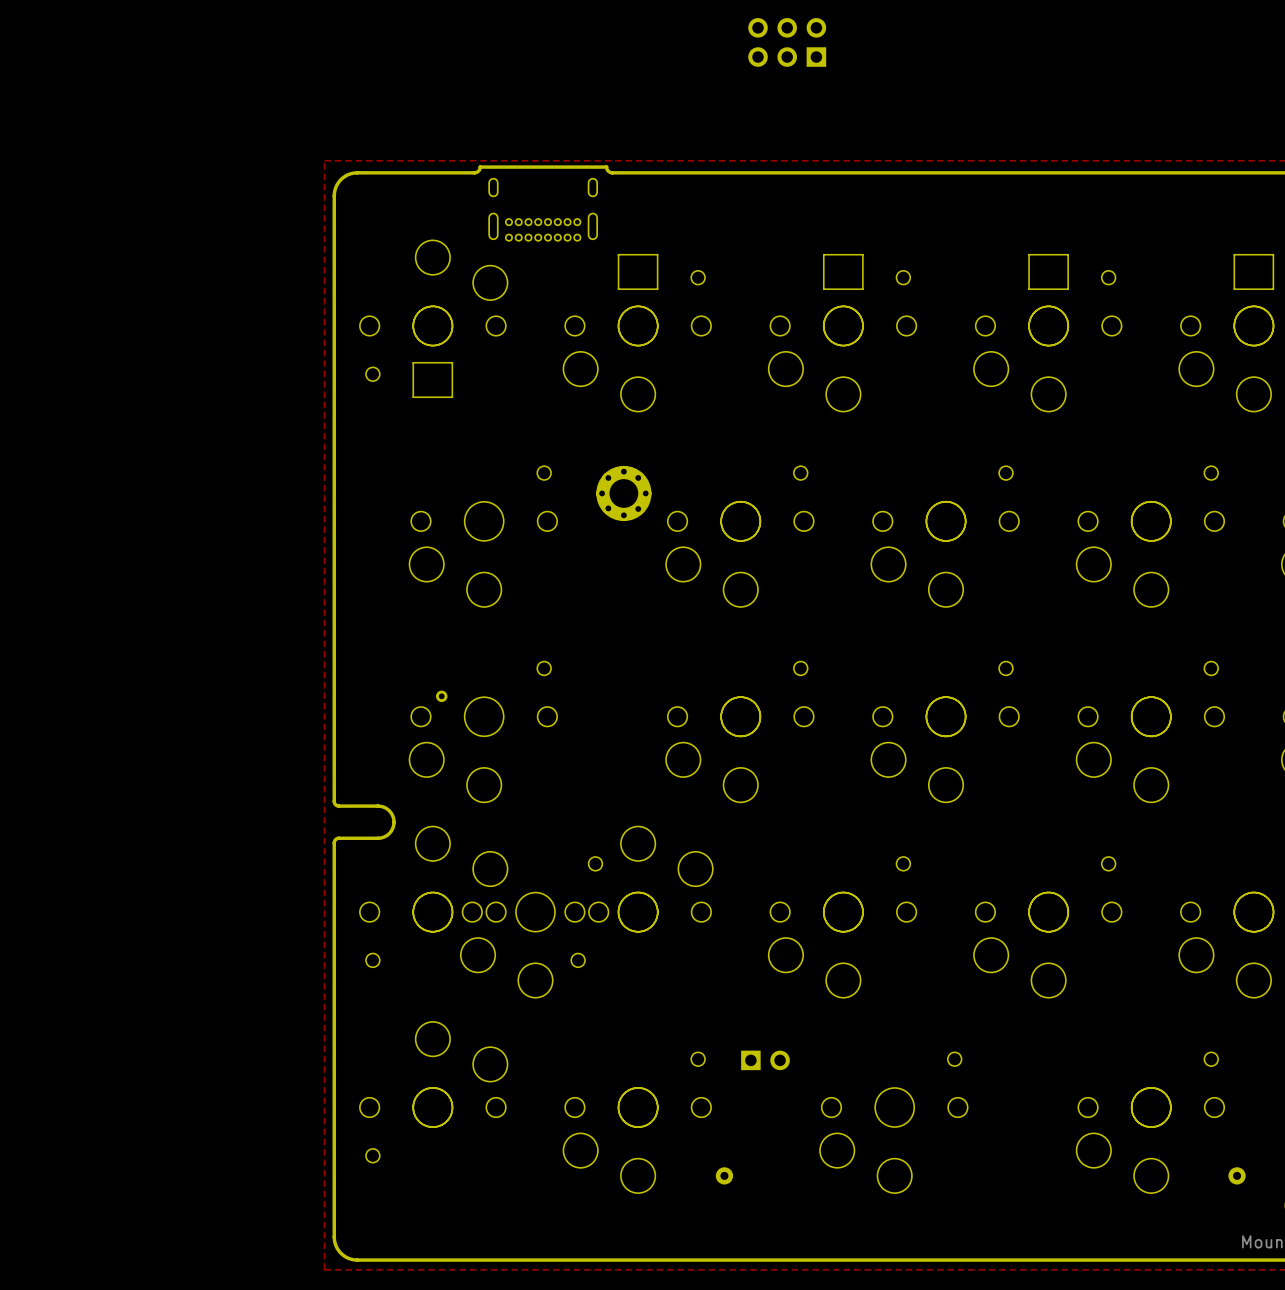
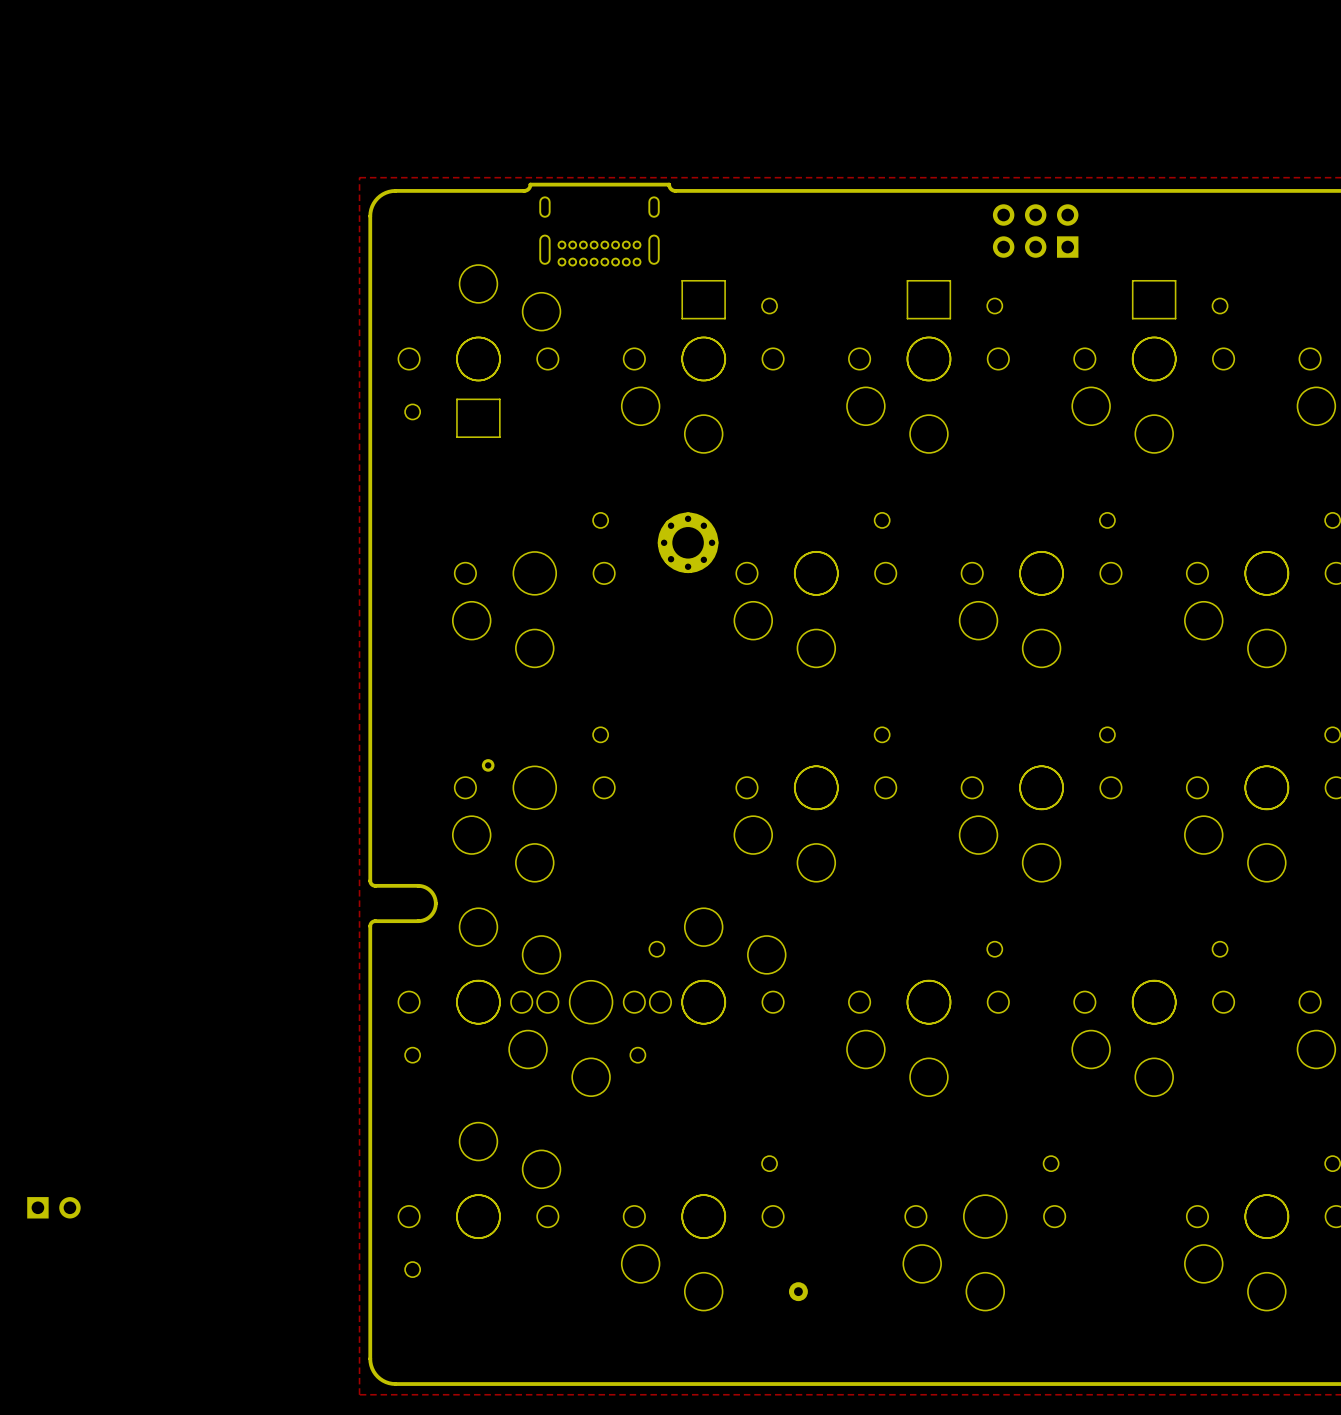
part position: (787, 42) -> (1035, 231)
part: (765, 1060) -> none
part: none -> (53, 1207)

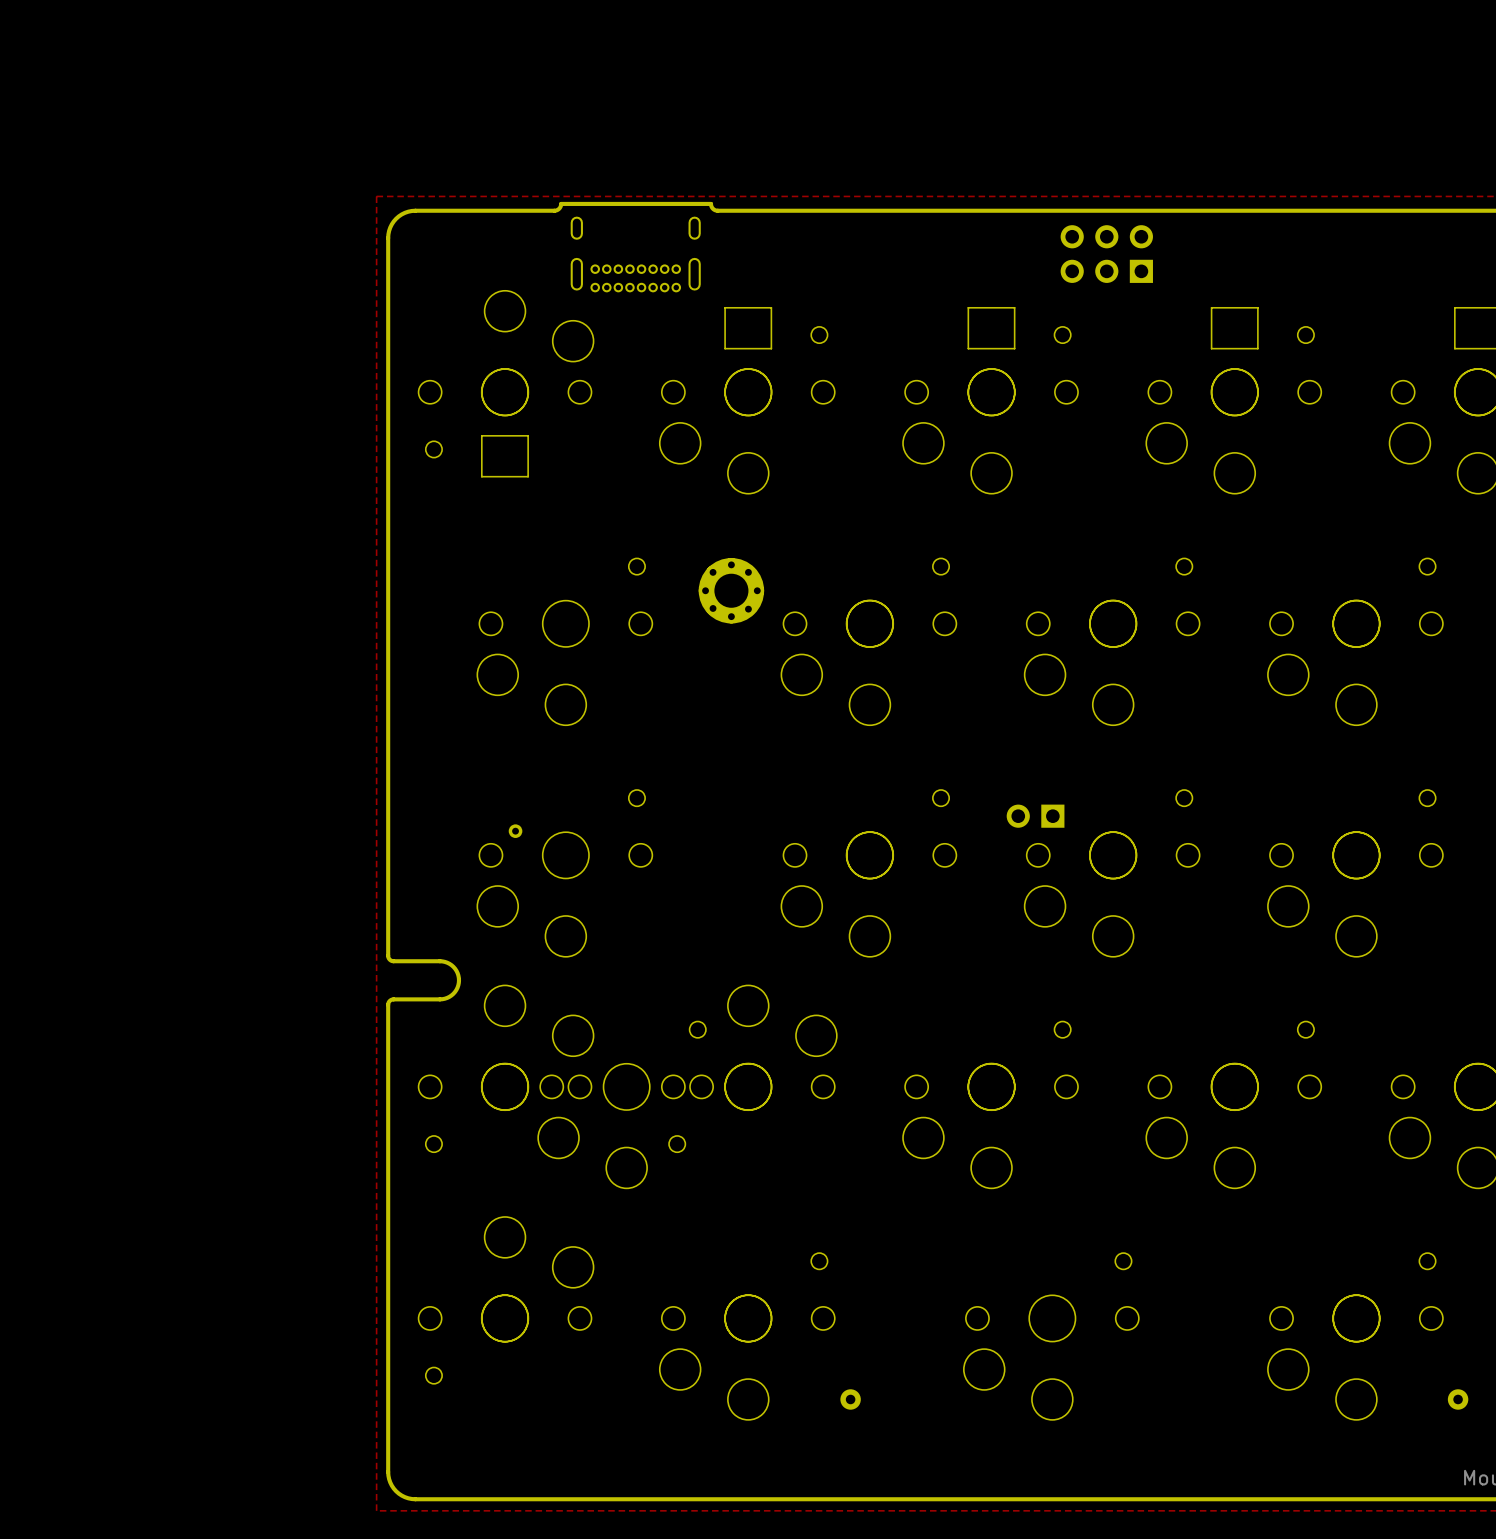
part: none -> (1035, 816)
part: (53, 1207) -> none

